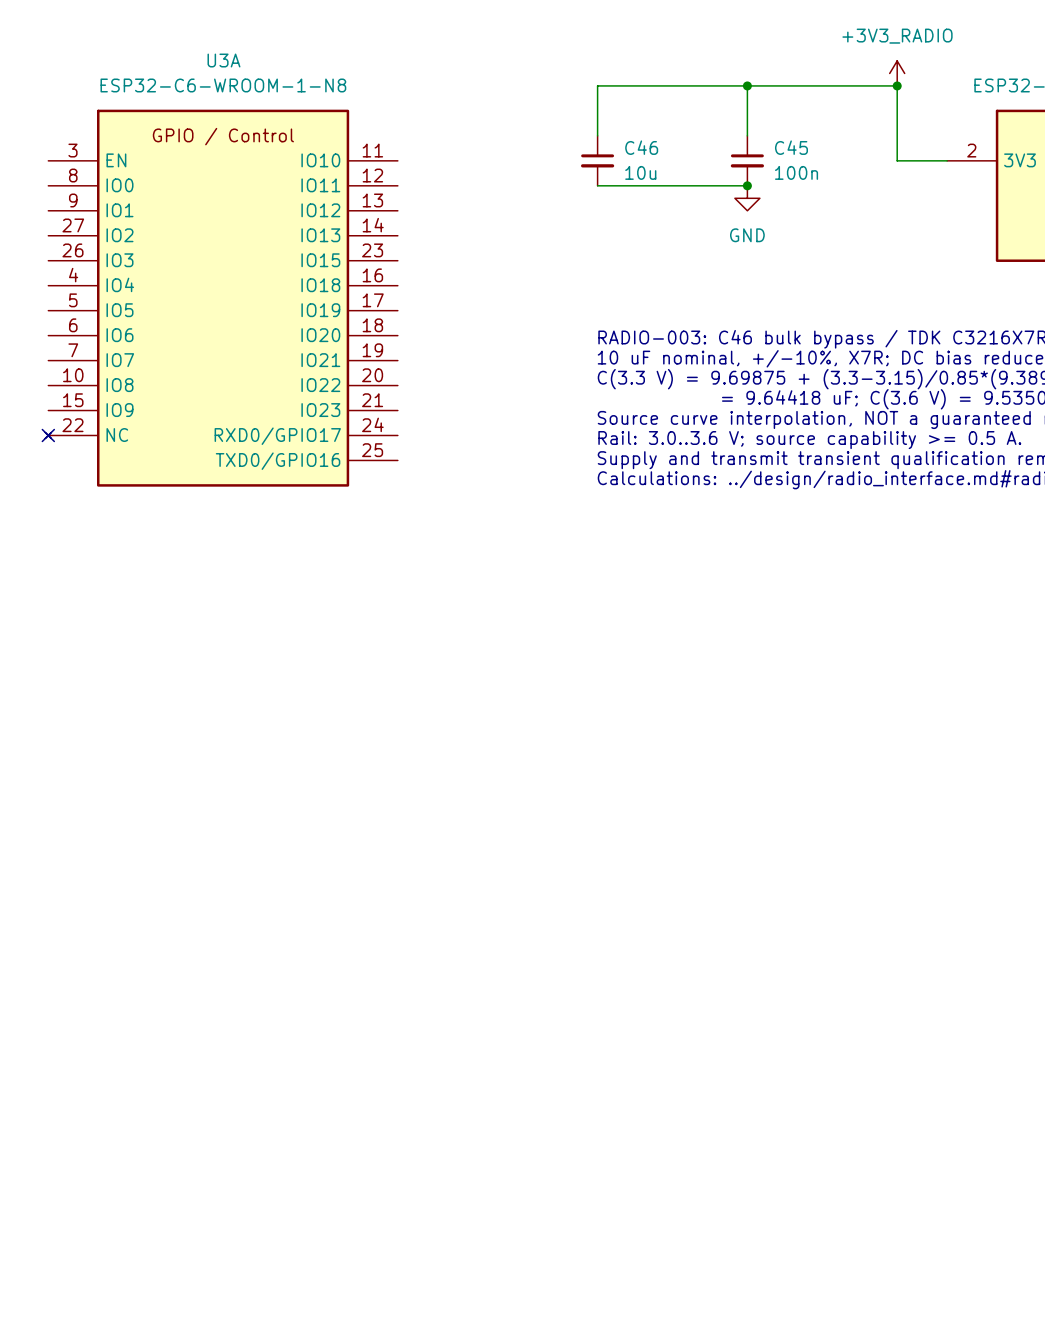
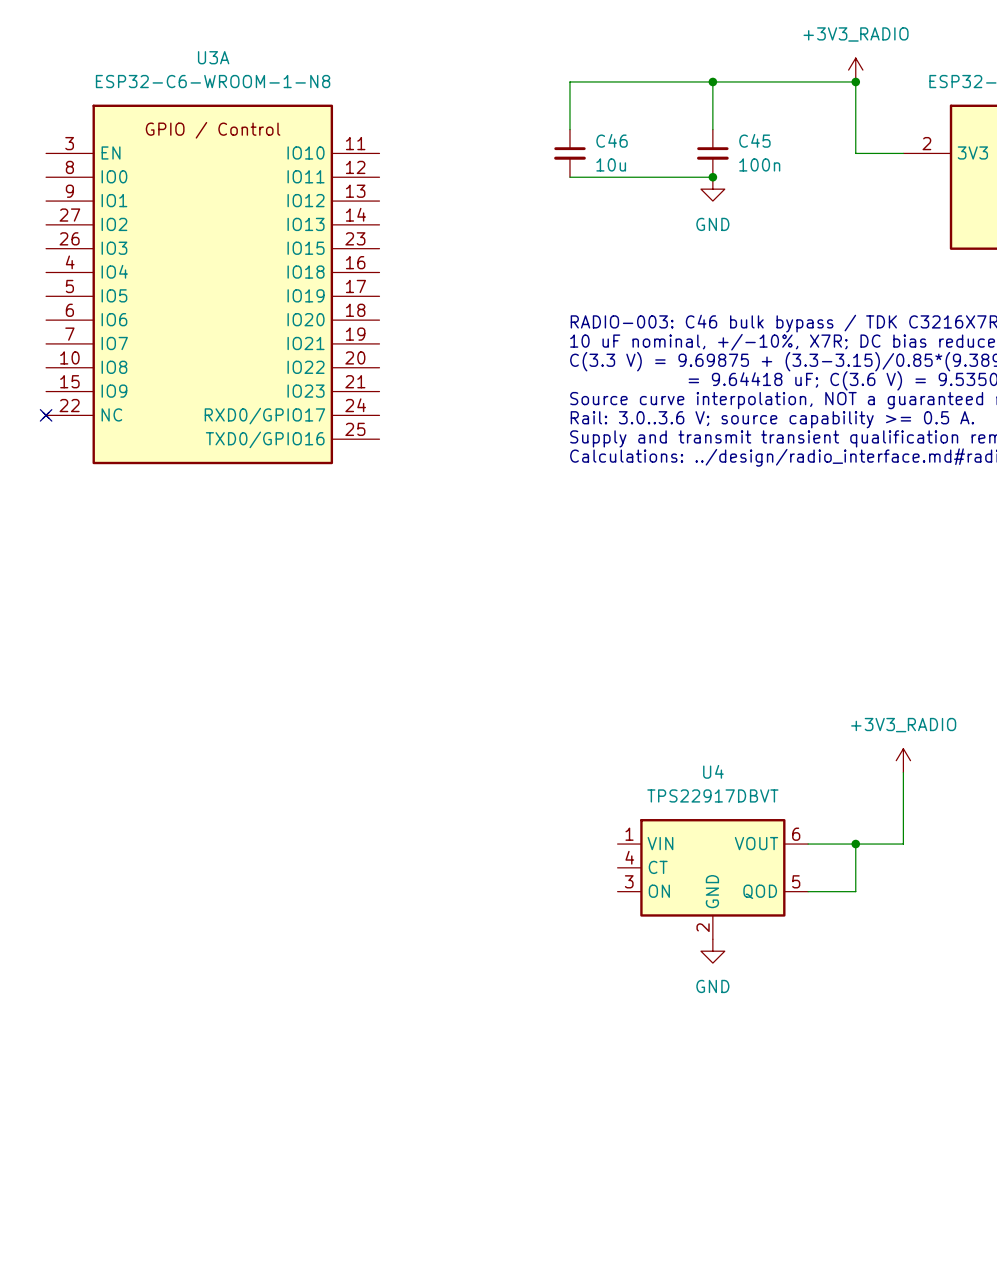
power symbol: none -> +3V3_RADIO (903, 760)
wire: none -> (903, 772) (903, 844) (808, 844)
wire: none -> (855, 844) (855, 891) (808, 891)
junction: none -> (855, 844)
U4: none -> TPS22917DBVT (712, 879)
power symbol: none -> GND (712, 951)

